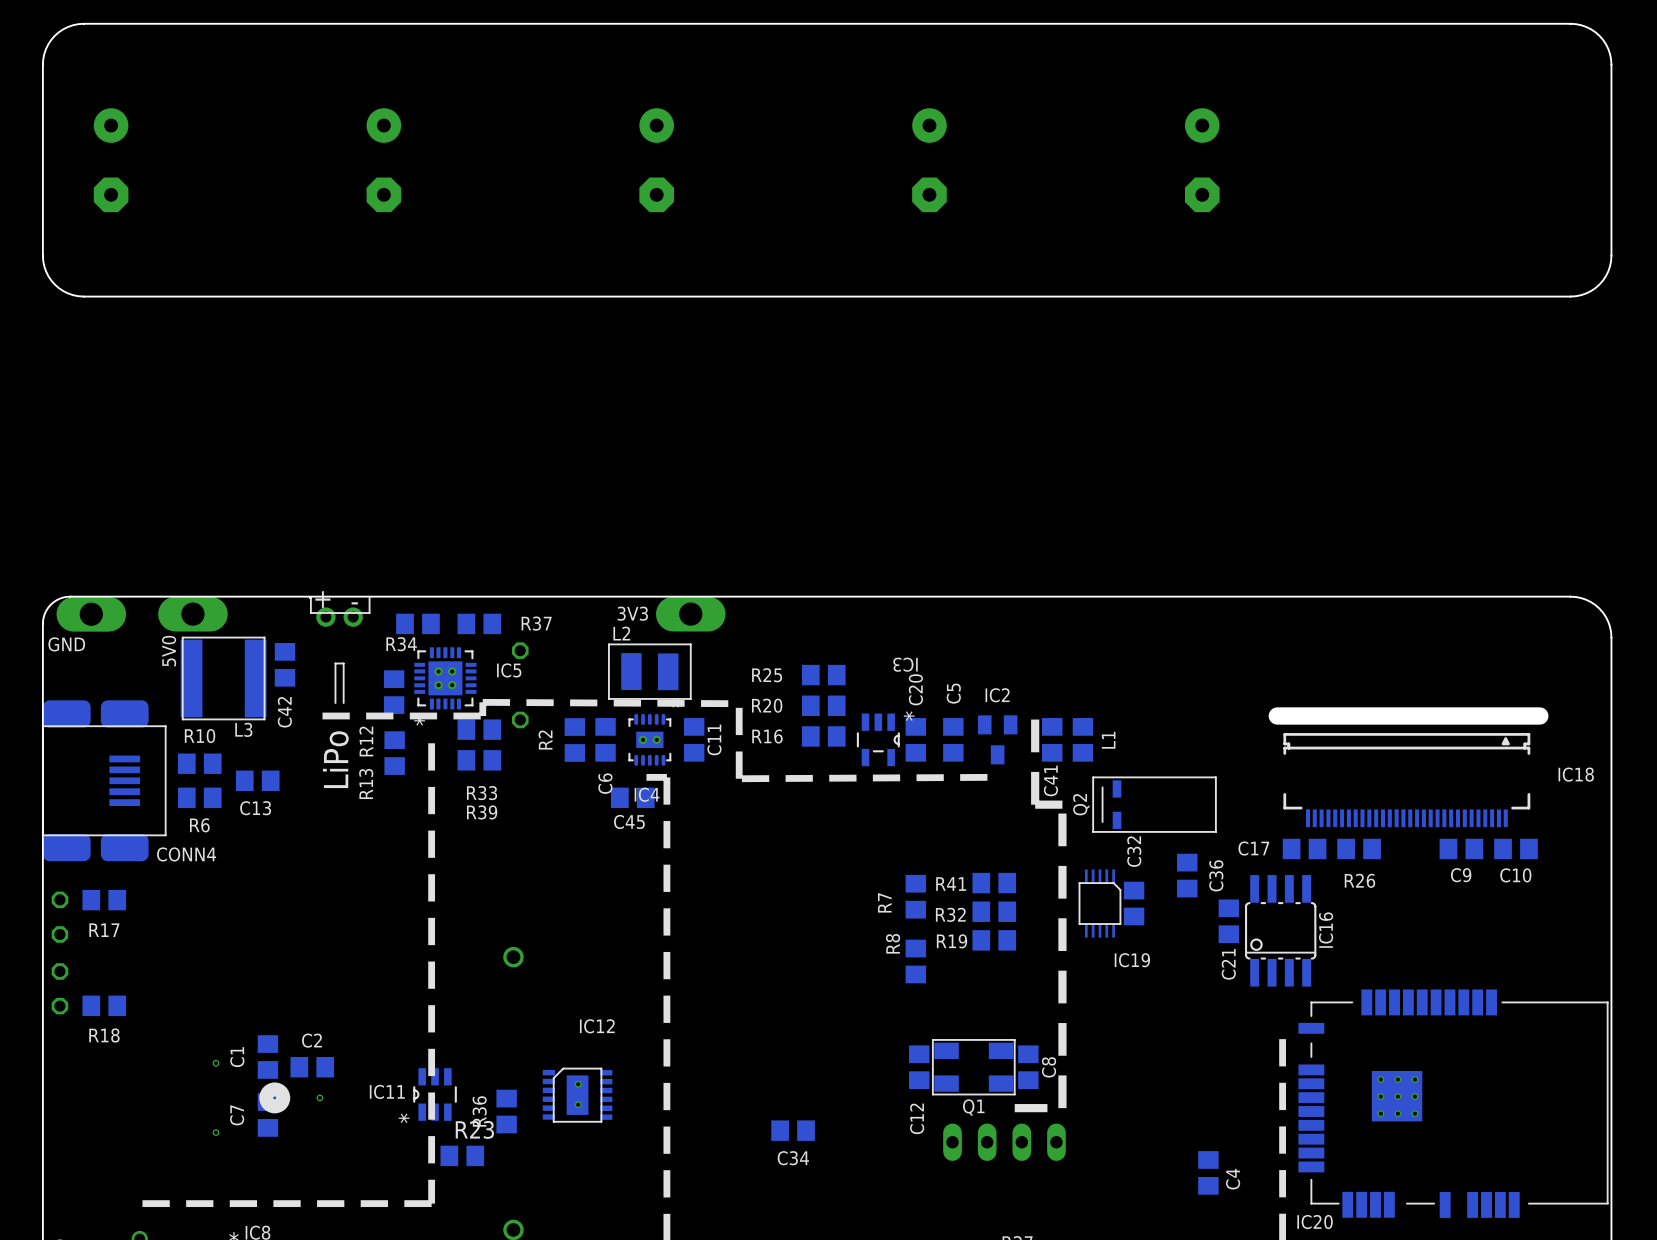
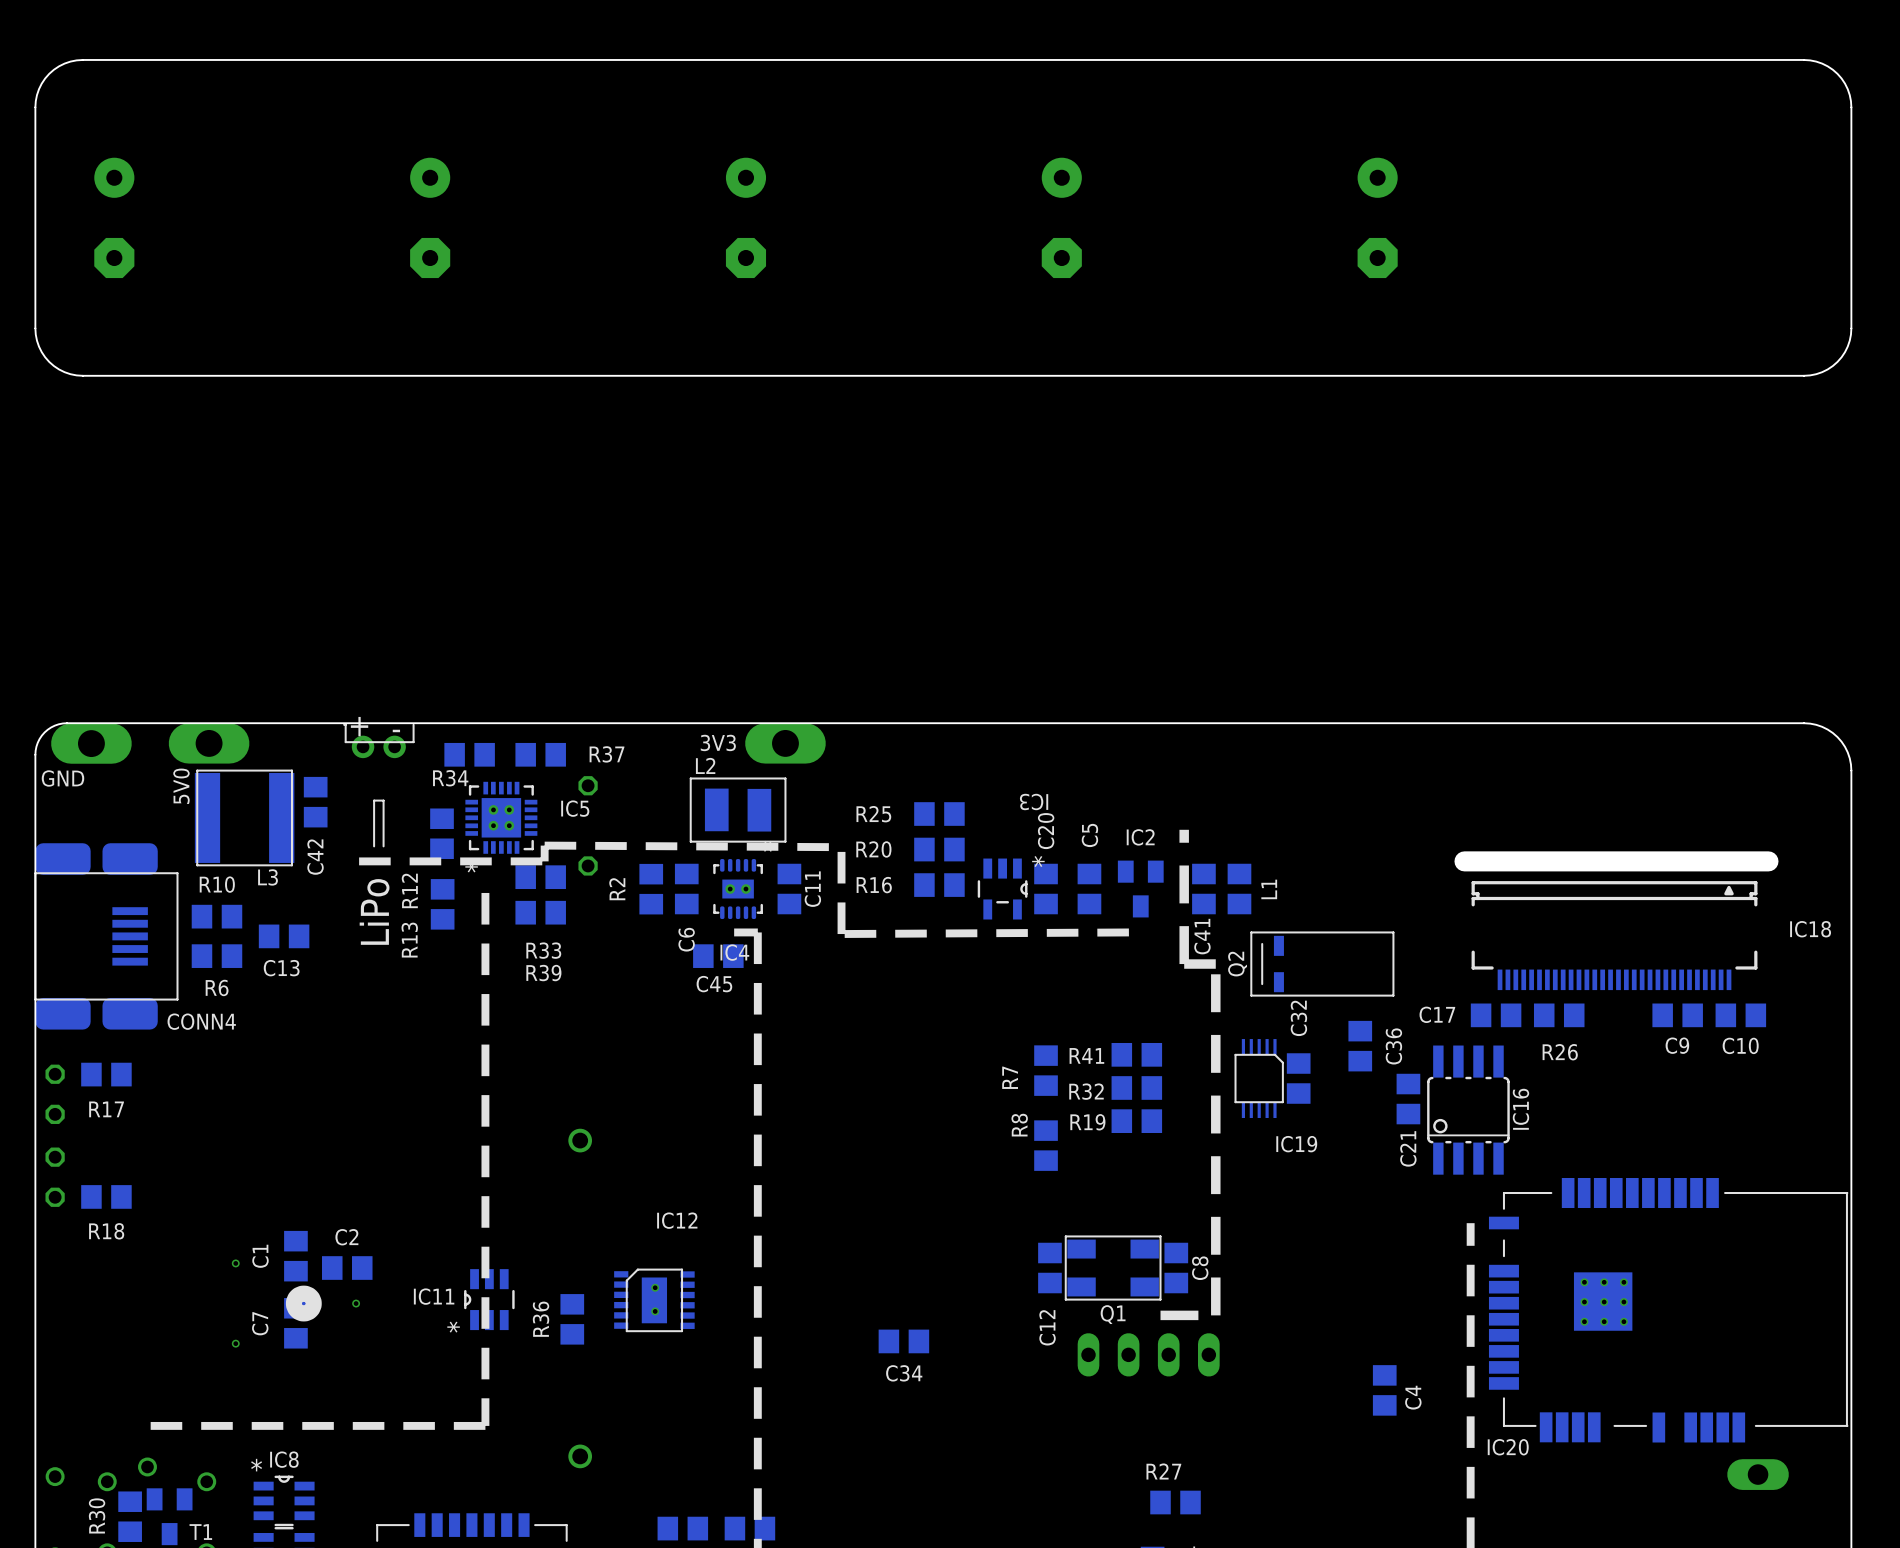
line: none -> (1184, 829) (1184, 845)
R23: (462, 1155) -> none

